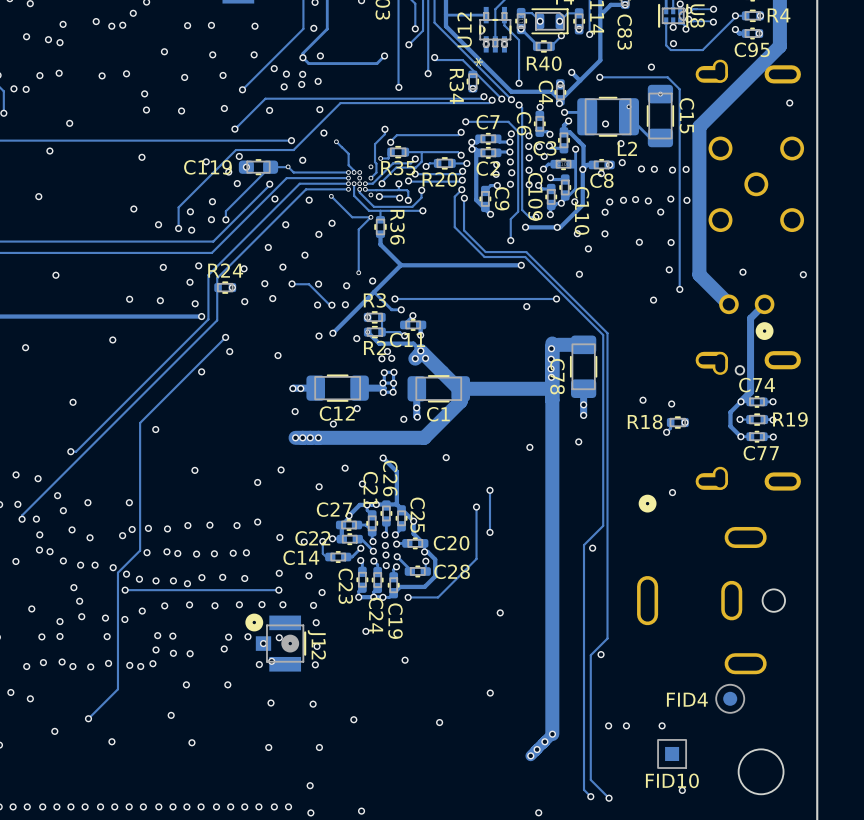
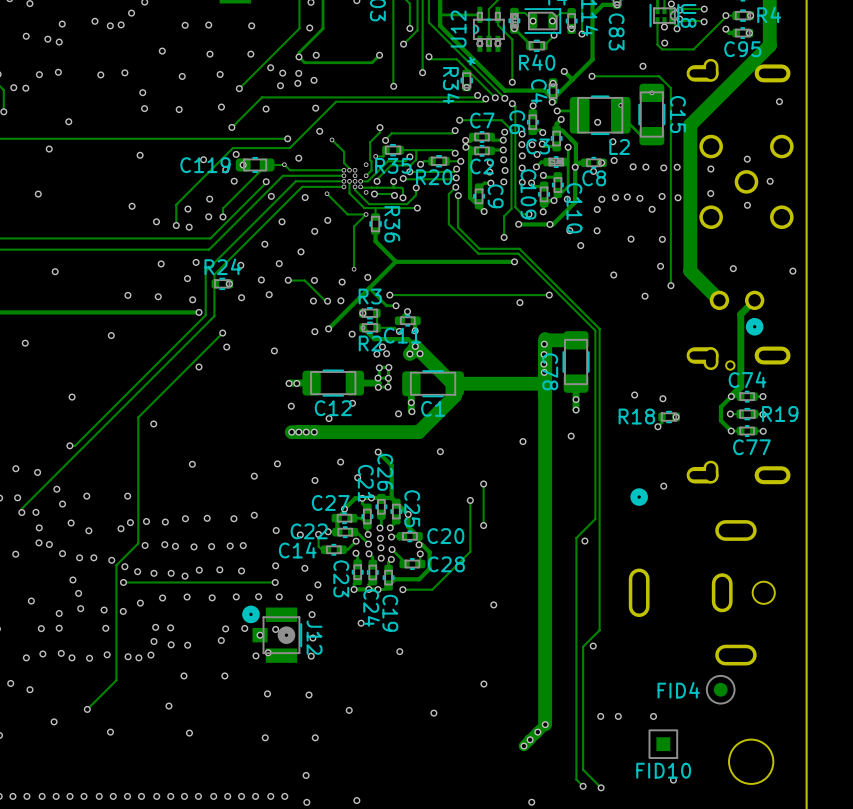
via: none -> (747, 159)
via: none -> (710, 169)
via: none -> (770, 181)
via: none -> (710, 193)
via: none -> (747, 205)
via position: (579, 274) -> (613, 275)

